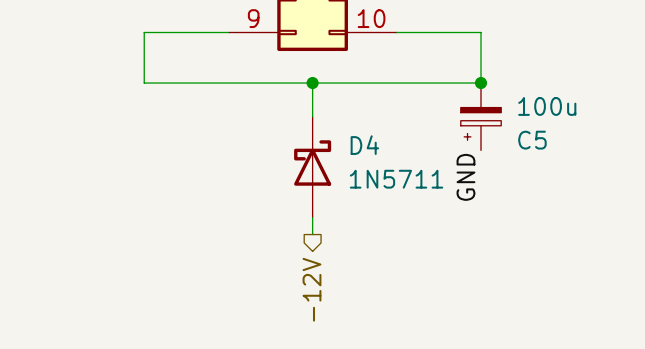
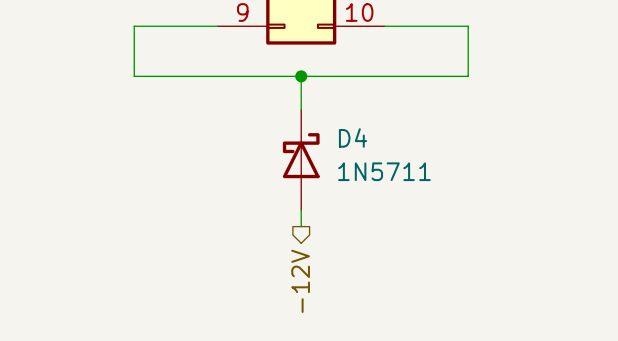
junction: (481, 83) -> none
C5: 100u (481, 116) -> none
label: GND (465, 177) -> none

